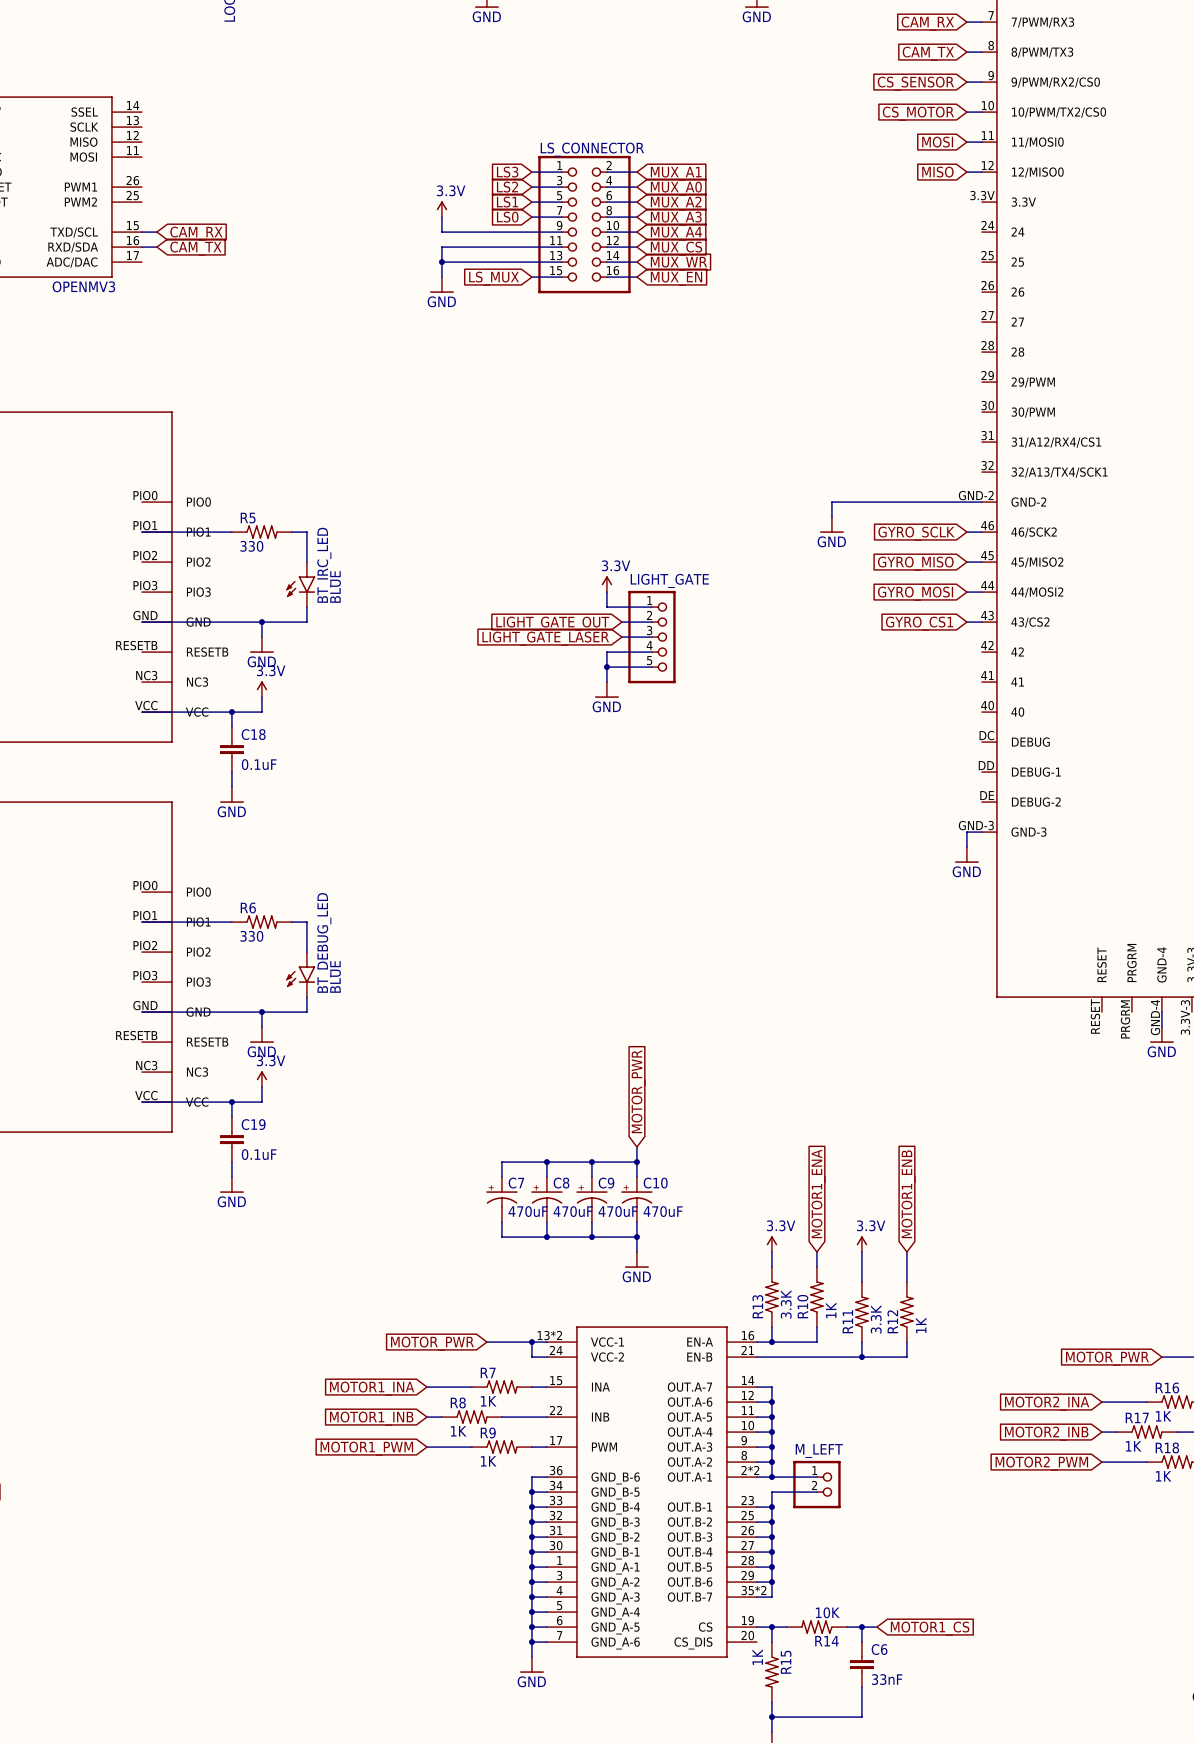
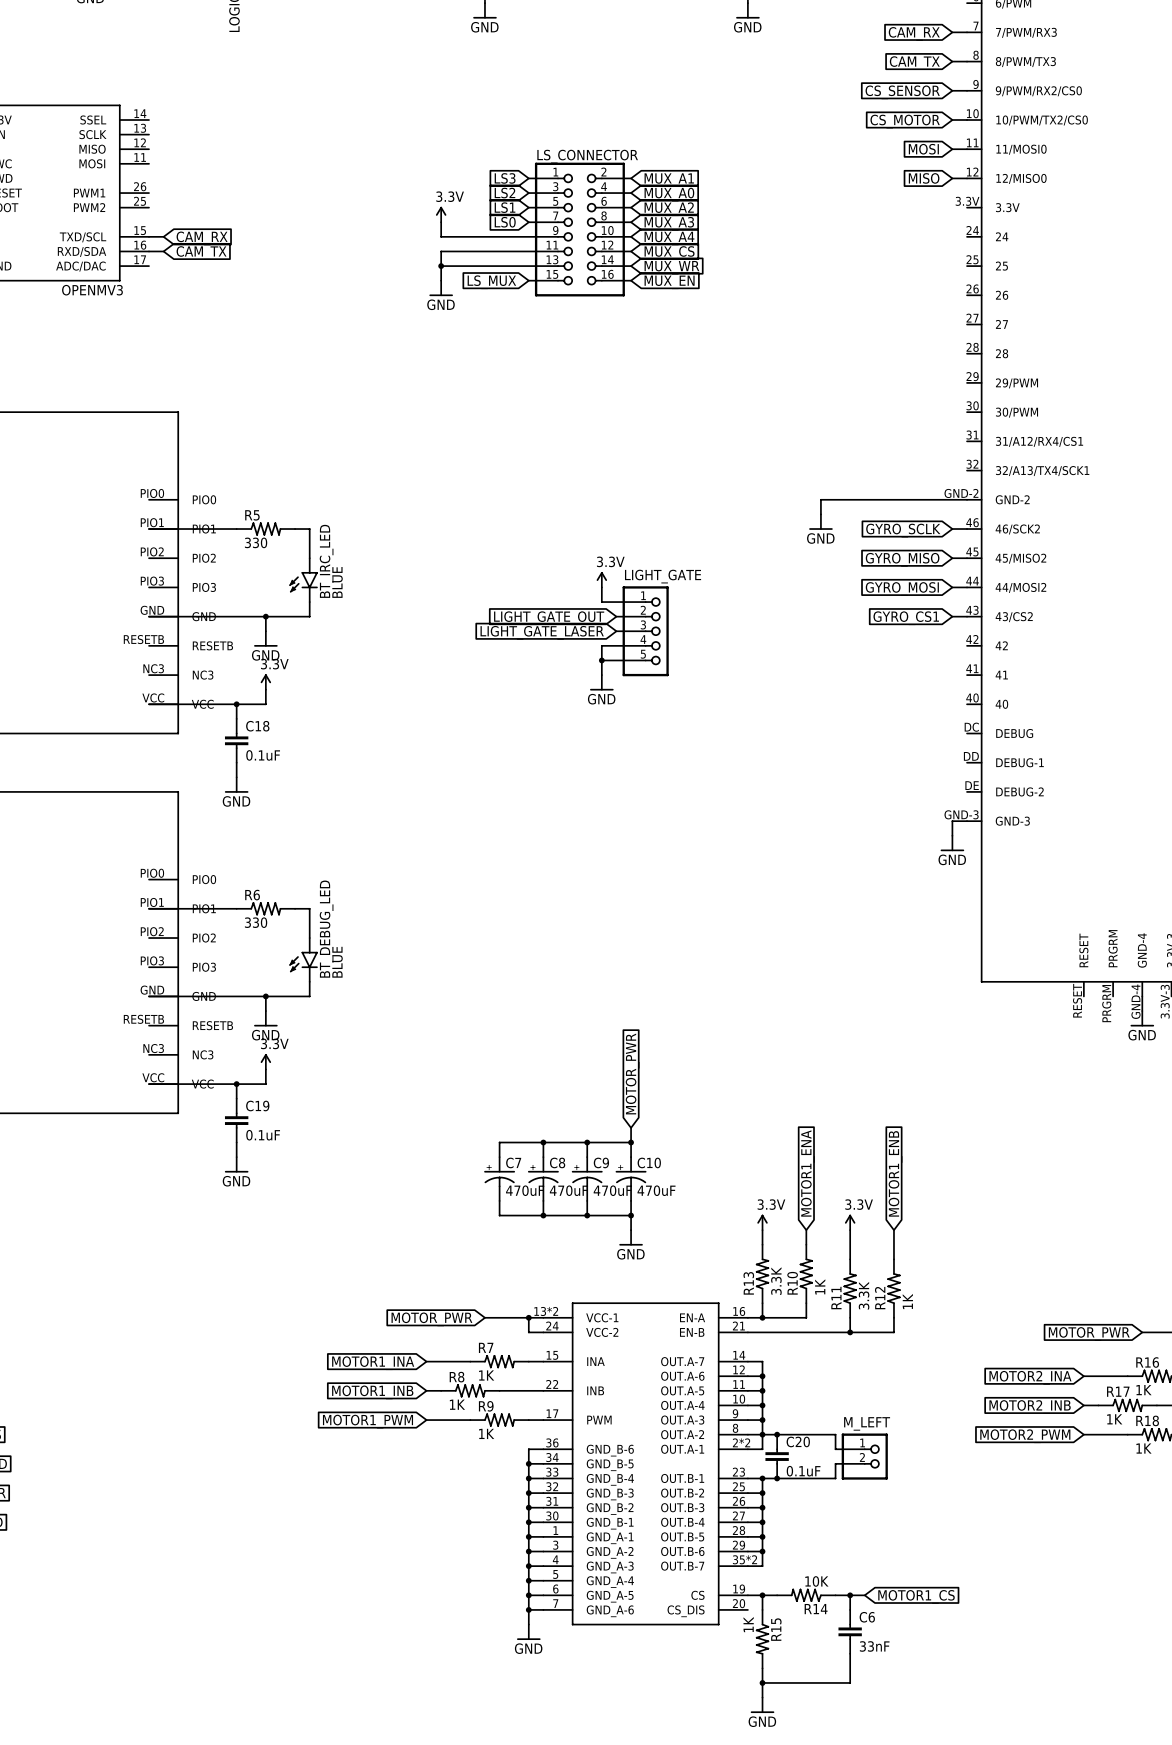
wire: none -> (762, 1434) (835, 1434) (835, 1449) (864, 1449)
junction: none -> (777, 1434)
wire: (771, 1477) (816, 1477) -> none
junction: (771, 1477) -> none
C20: none -> 0.1uF (777, 1456)
M_LEFT position: (816, 1484) -> (864, 1456)
wire: (816, 1492) (771, 1492) (771, 1507) -> (864, 1463) (835, 1463) (835, 1478) (762, 1478)
junction: none -> (777, 1478)

